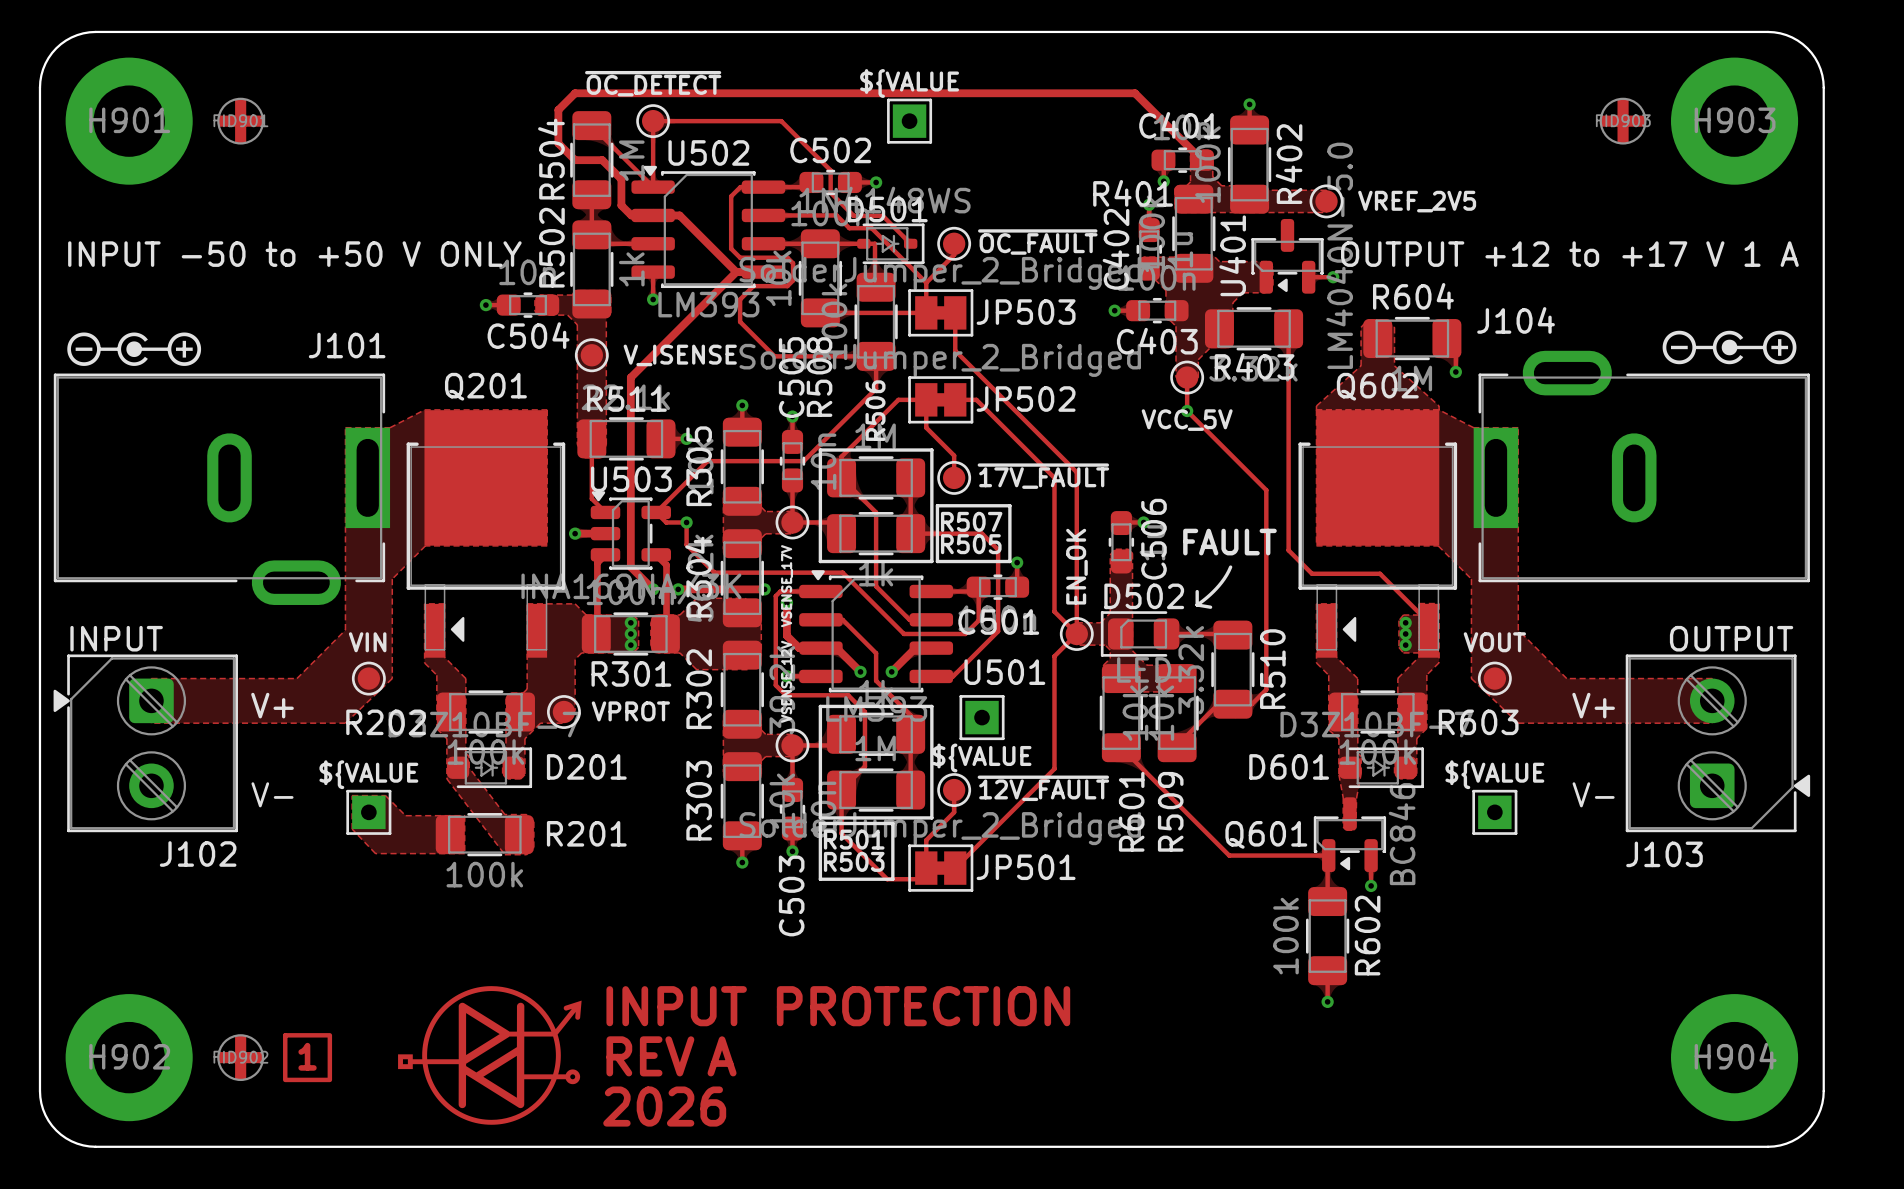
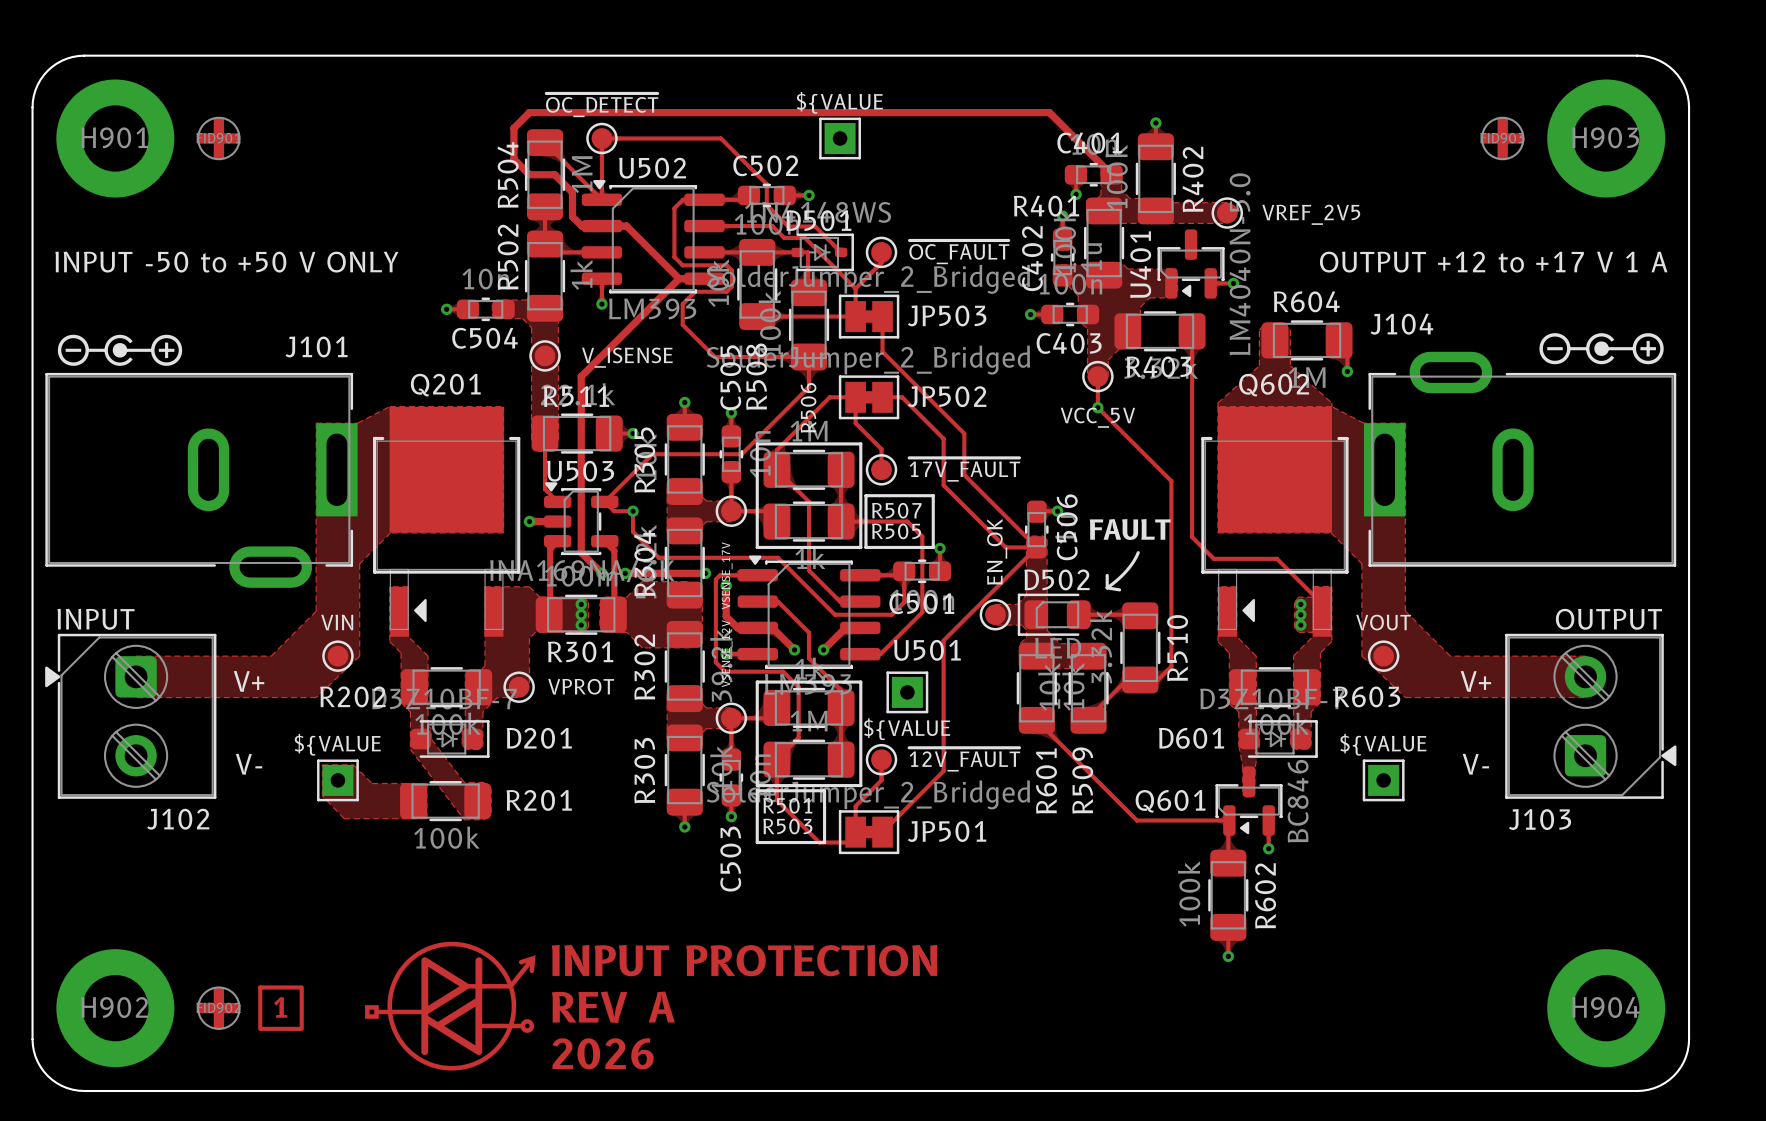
track: (1043, 438) (1076, 472) (1076, 633) -> (964, 433) (964, 474) (1036, 547)
track: (1021, 444) (1054, 477) (1054, 611) (1076, 633) -> (943, 438) (943, 485) (1005, 547) (1036, 547)
track: (1076, 633) (1054, 656) (1054, 768) (1021, 802) -> (1036, 547) (943, 640) (943, 771)

